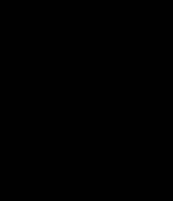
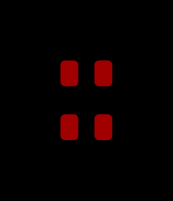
part: none -> (86, 73)
part: none -> (86, 127)

